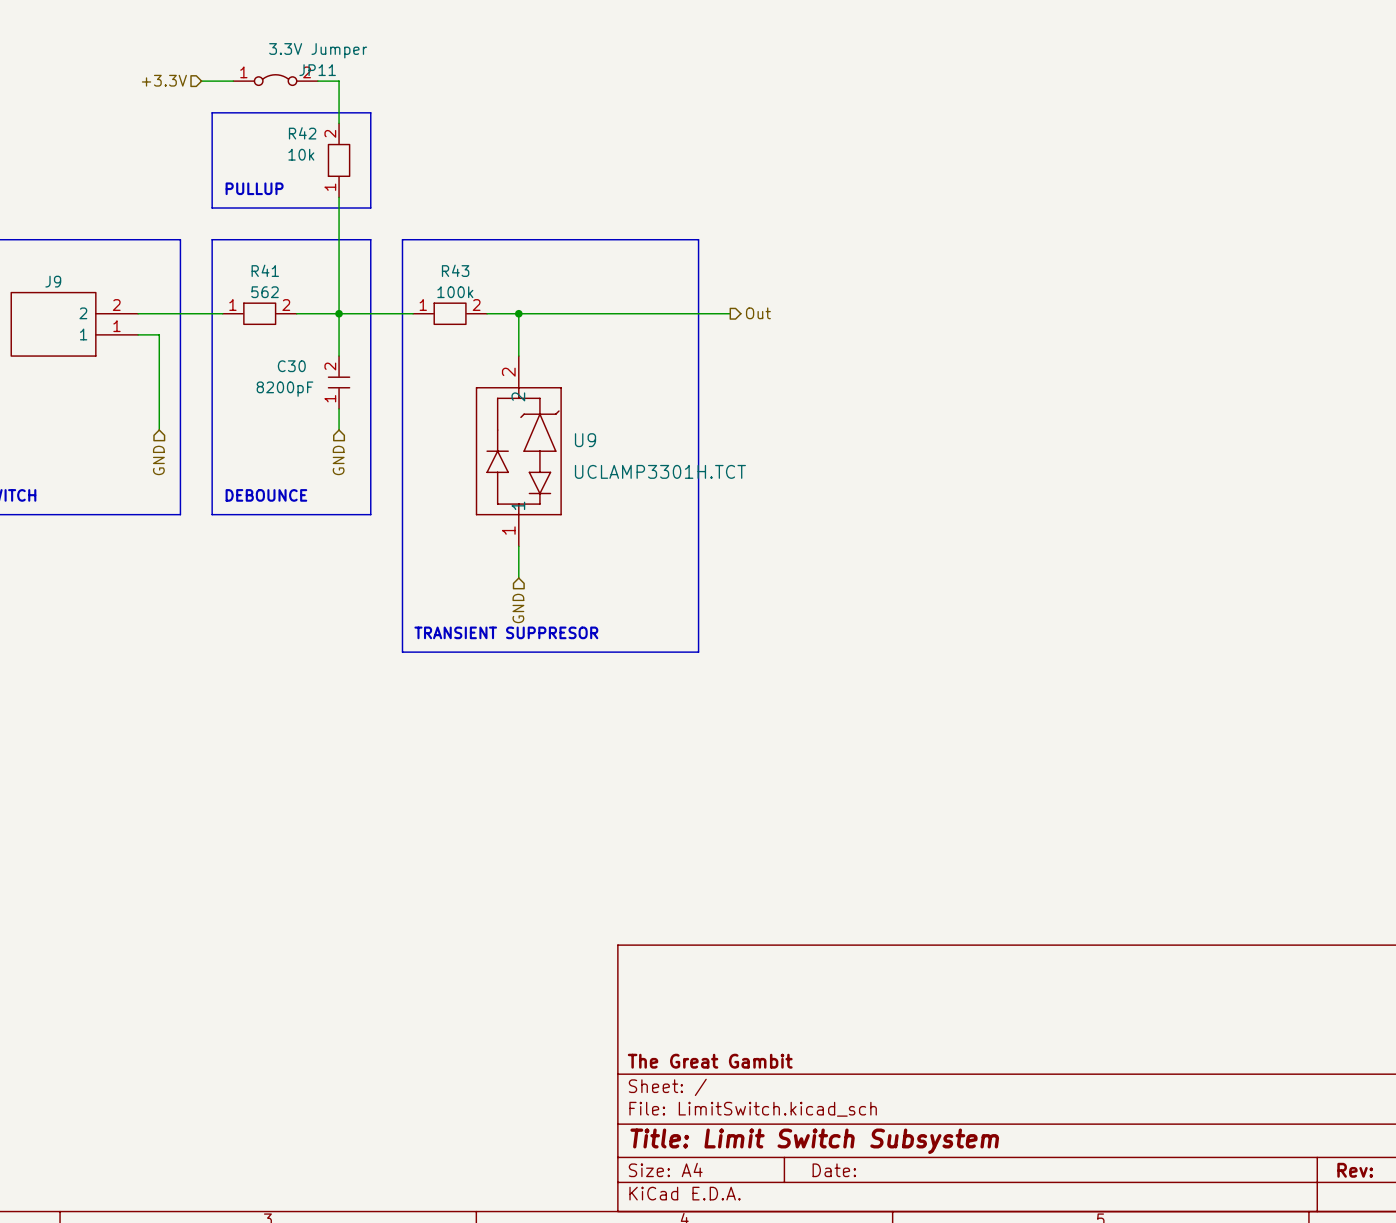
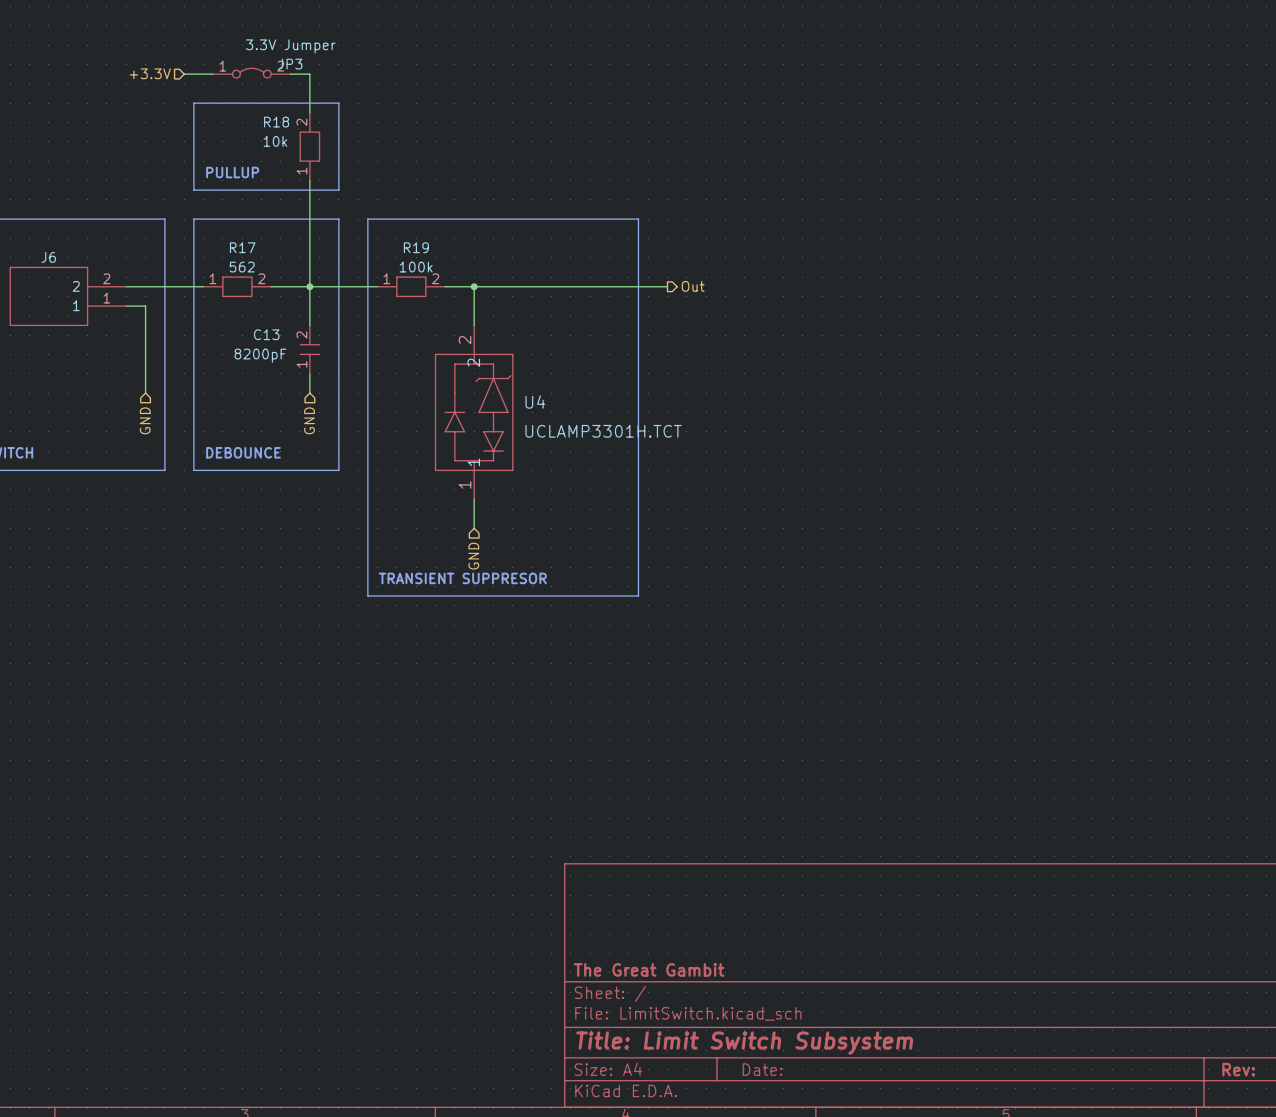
JP11 name: JP11 (317, 70) -> JP3 (290, 64)
R42 name: R42 (302, 133) -> R18 (276, 122)
R41 name: R41 (265, 270) -> R17 (242, 247)
R43 name: R43 (455, 270) -> R19 (416, 247)
J9 name: J9 (53, 281) -> J6 (48, 257)
C30 name: C30 (291, 366) -> C13 (266, 334)
U9 name: U9 (585, 440) -> U4 (535, 402)

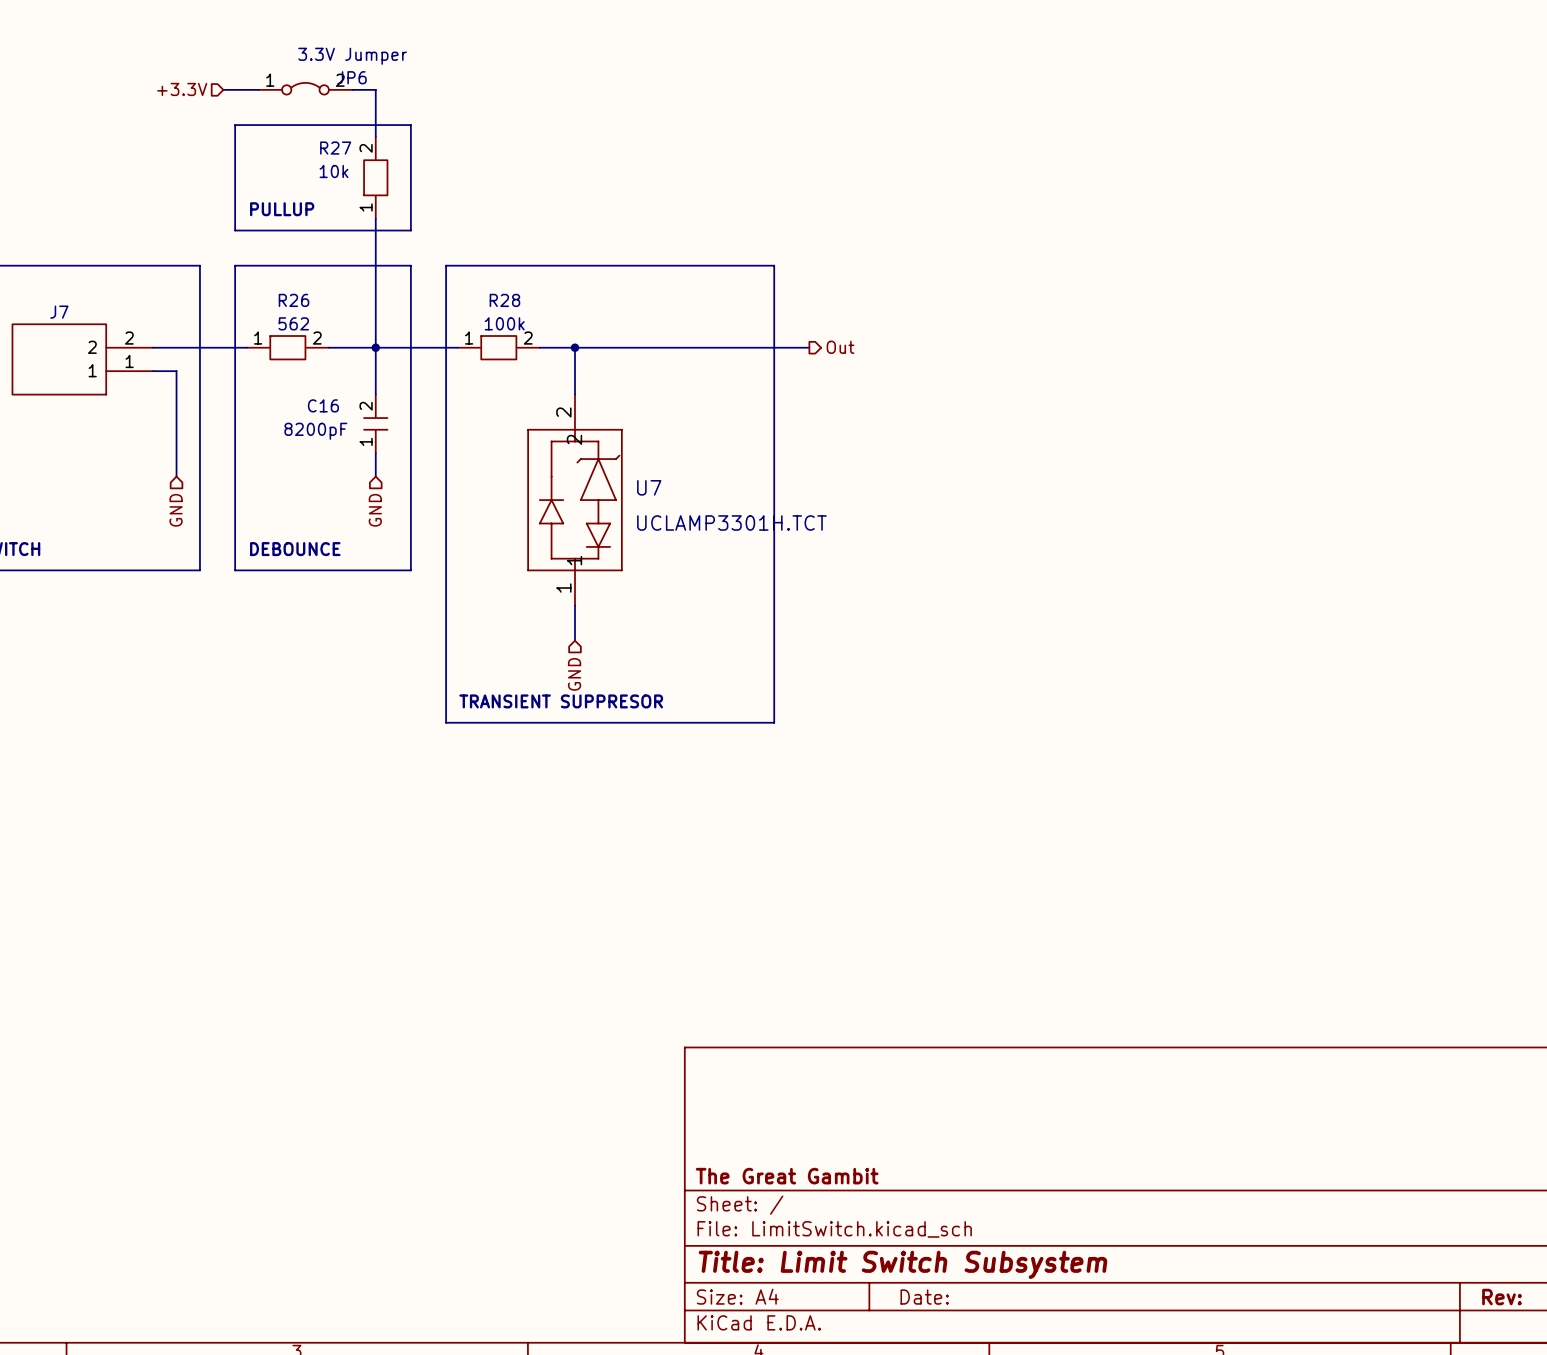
JP3 name: JP3 (290, 64) -> JP6 (352, 77)
R18 name: R18 (276, 122) -> R27 (335, 148)
R17 name: R17 (242, 247) -> R26 (294, 300)
R19 name: R19 (416, 247) -> R28 (504, 300)
J6 name: J6 (48, 257) -> J7 (59, 312)
C13 name: C13 (266, 334) -> C16 (323, 405)
U4 name: U4 (535, 402) -> U7 (649, 487)

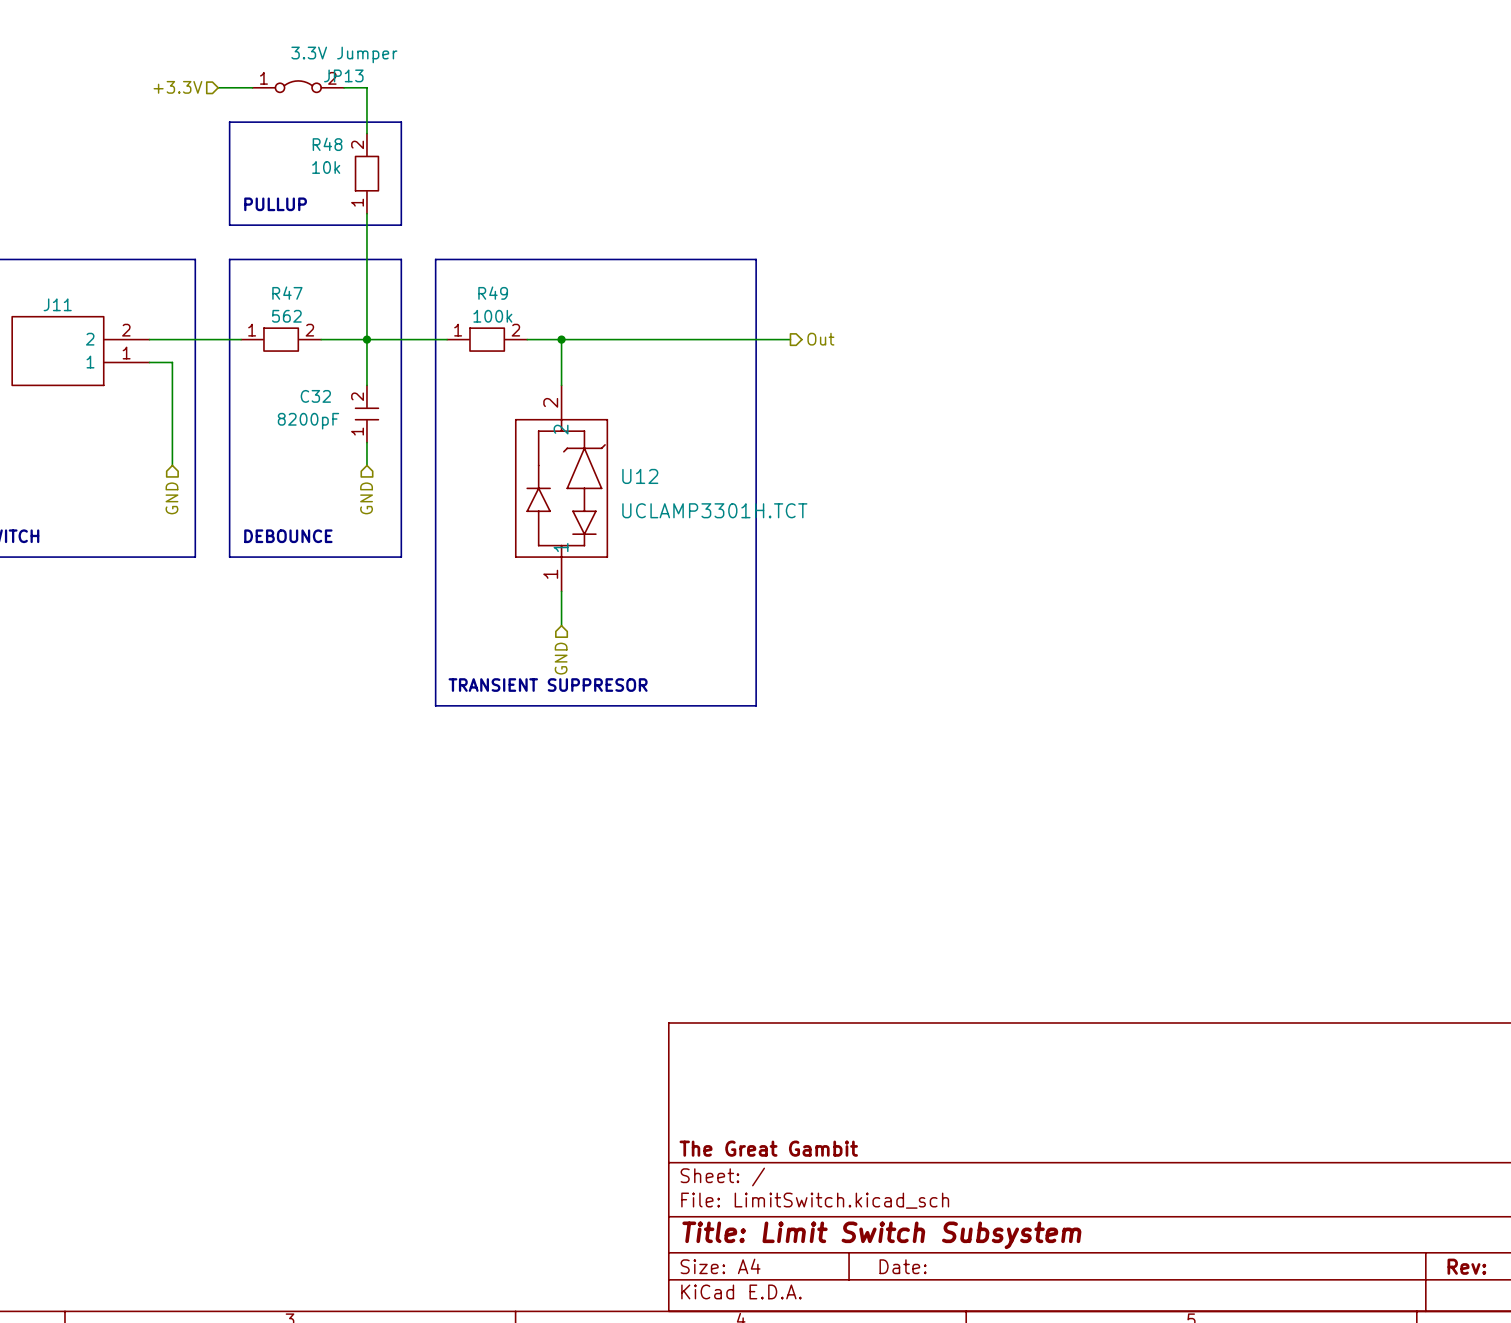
JP6 name: JP6 (352, 77) -> JP13 (343, 75)
R27 name: R27 (335, 148) -> R48 (327, 144)
R26 name: R26 (294, 300) -> R47 (287, 293)
R28 name: R28 (504, 300) -> R49 (493, 293)
J7 name: J7 (59, 312) -> J11 (57, 304)
C16 name: C16 (323, 405) -> C32 (315, 396)
U7 name: U7 (649, 487) -> U12 (640, 476)

